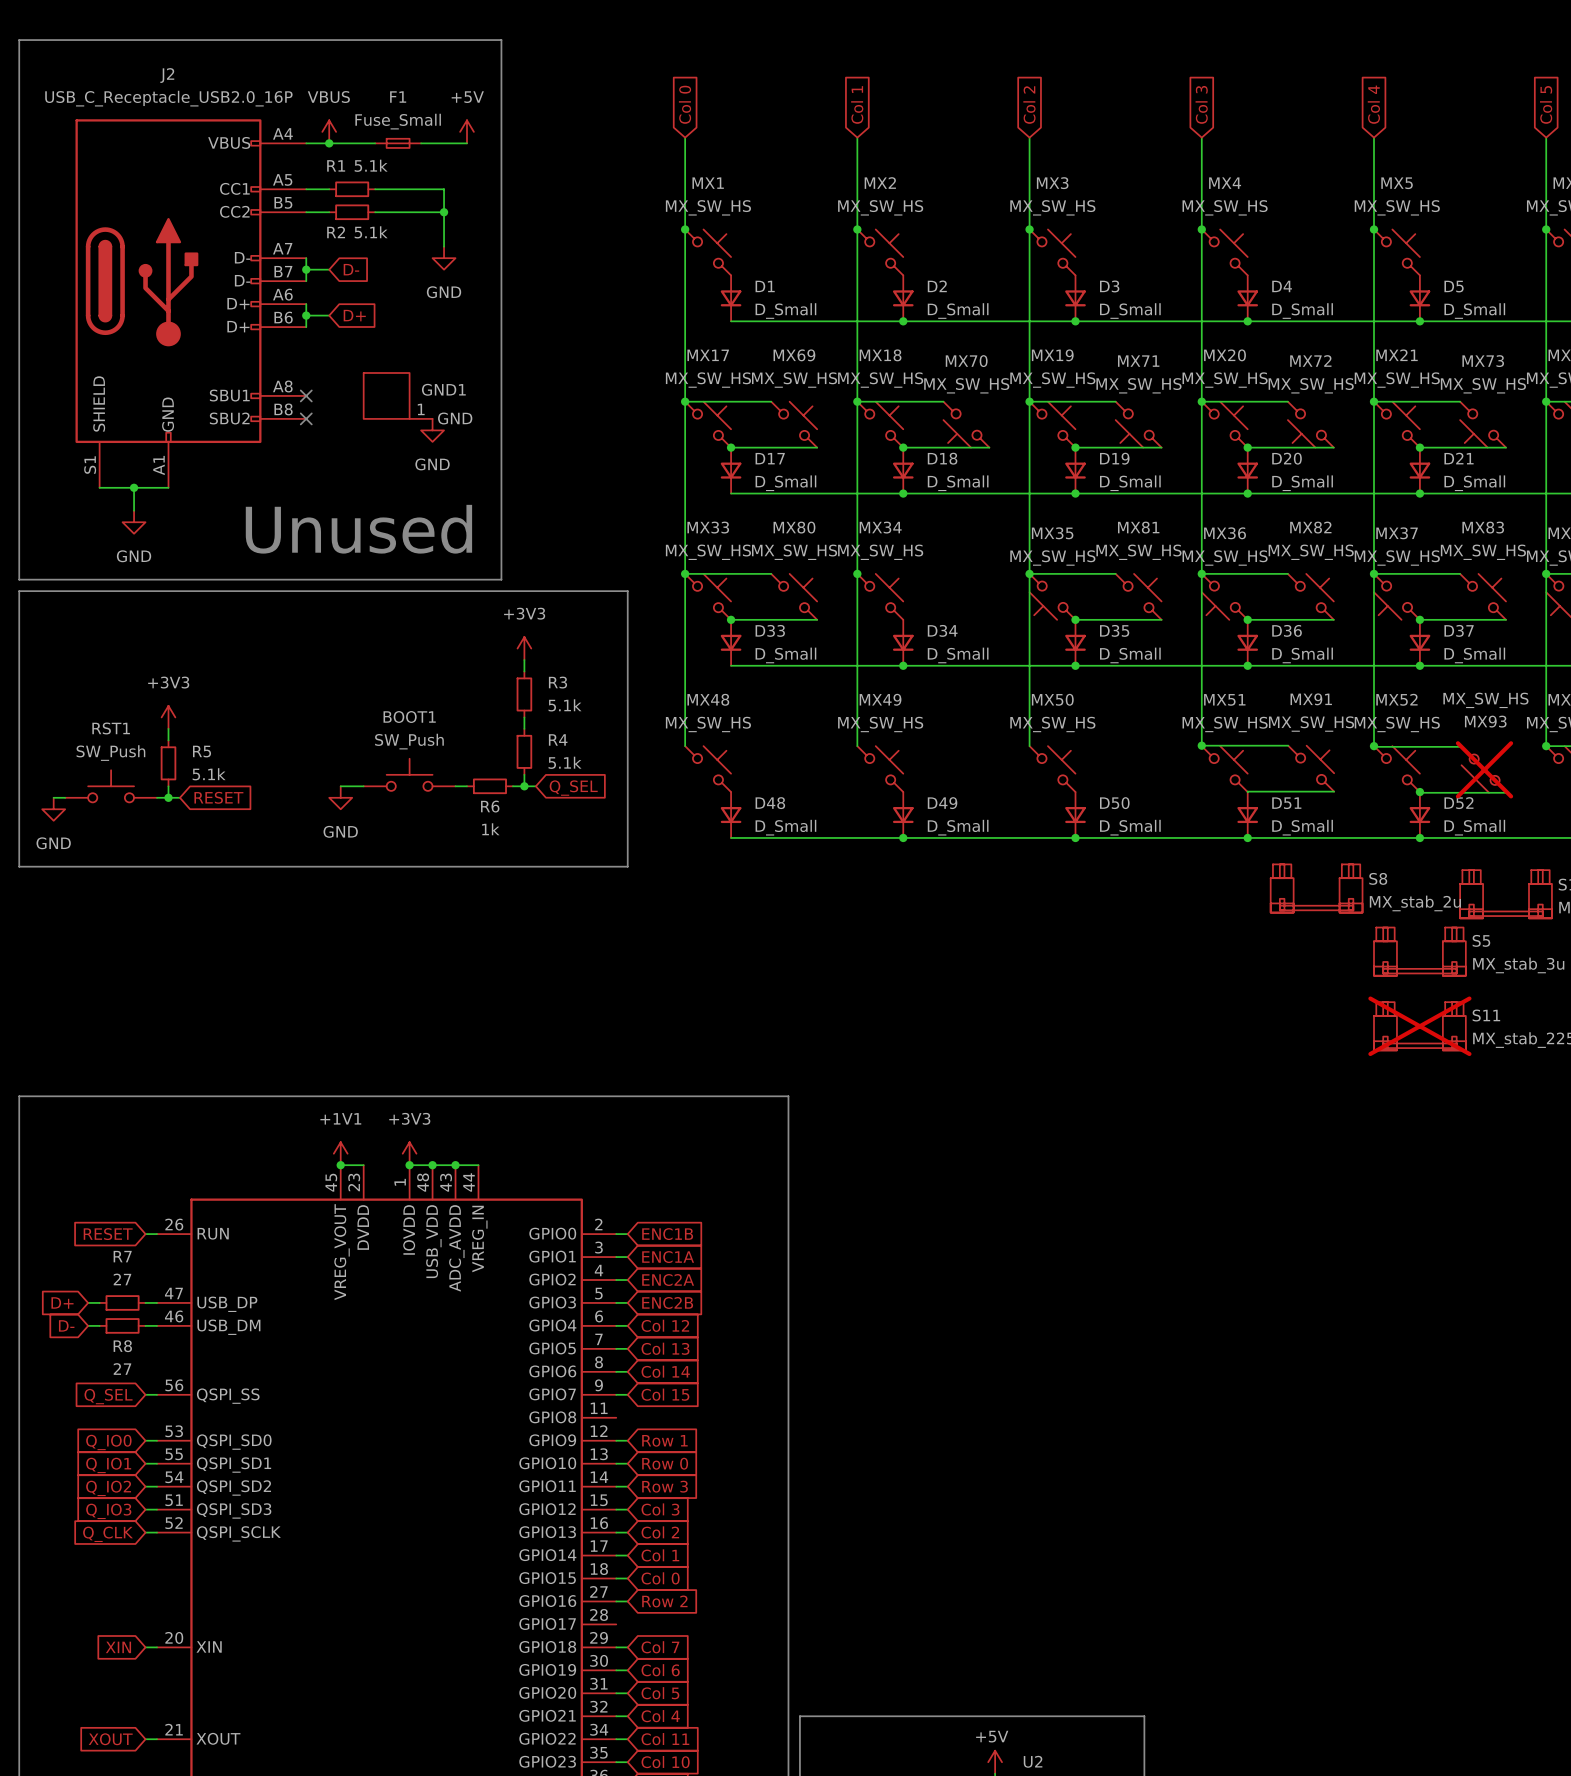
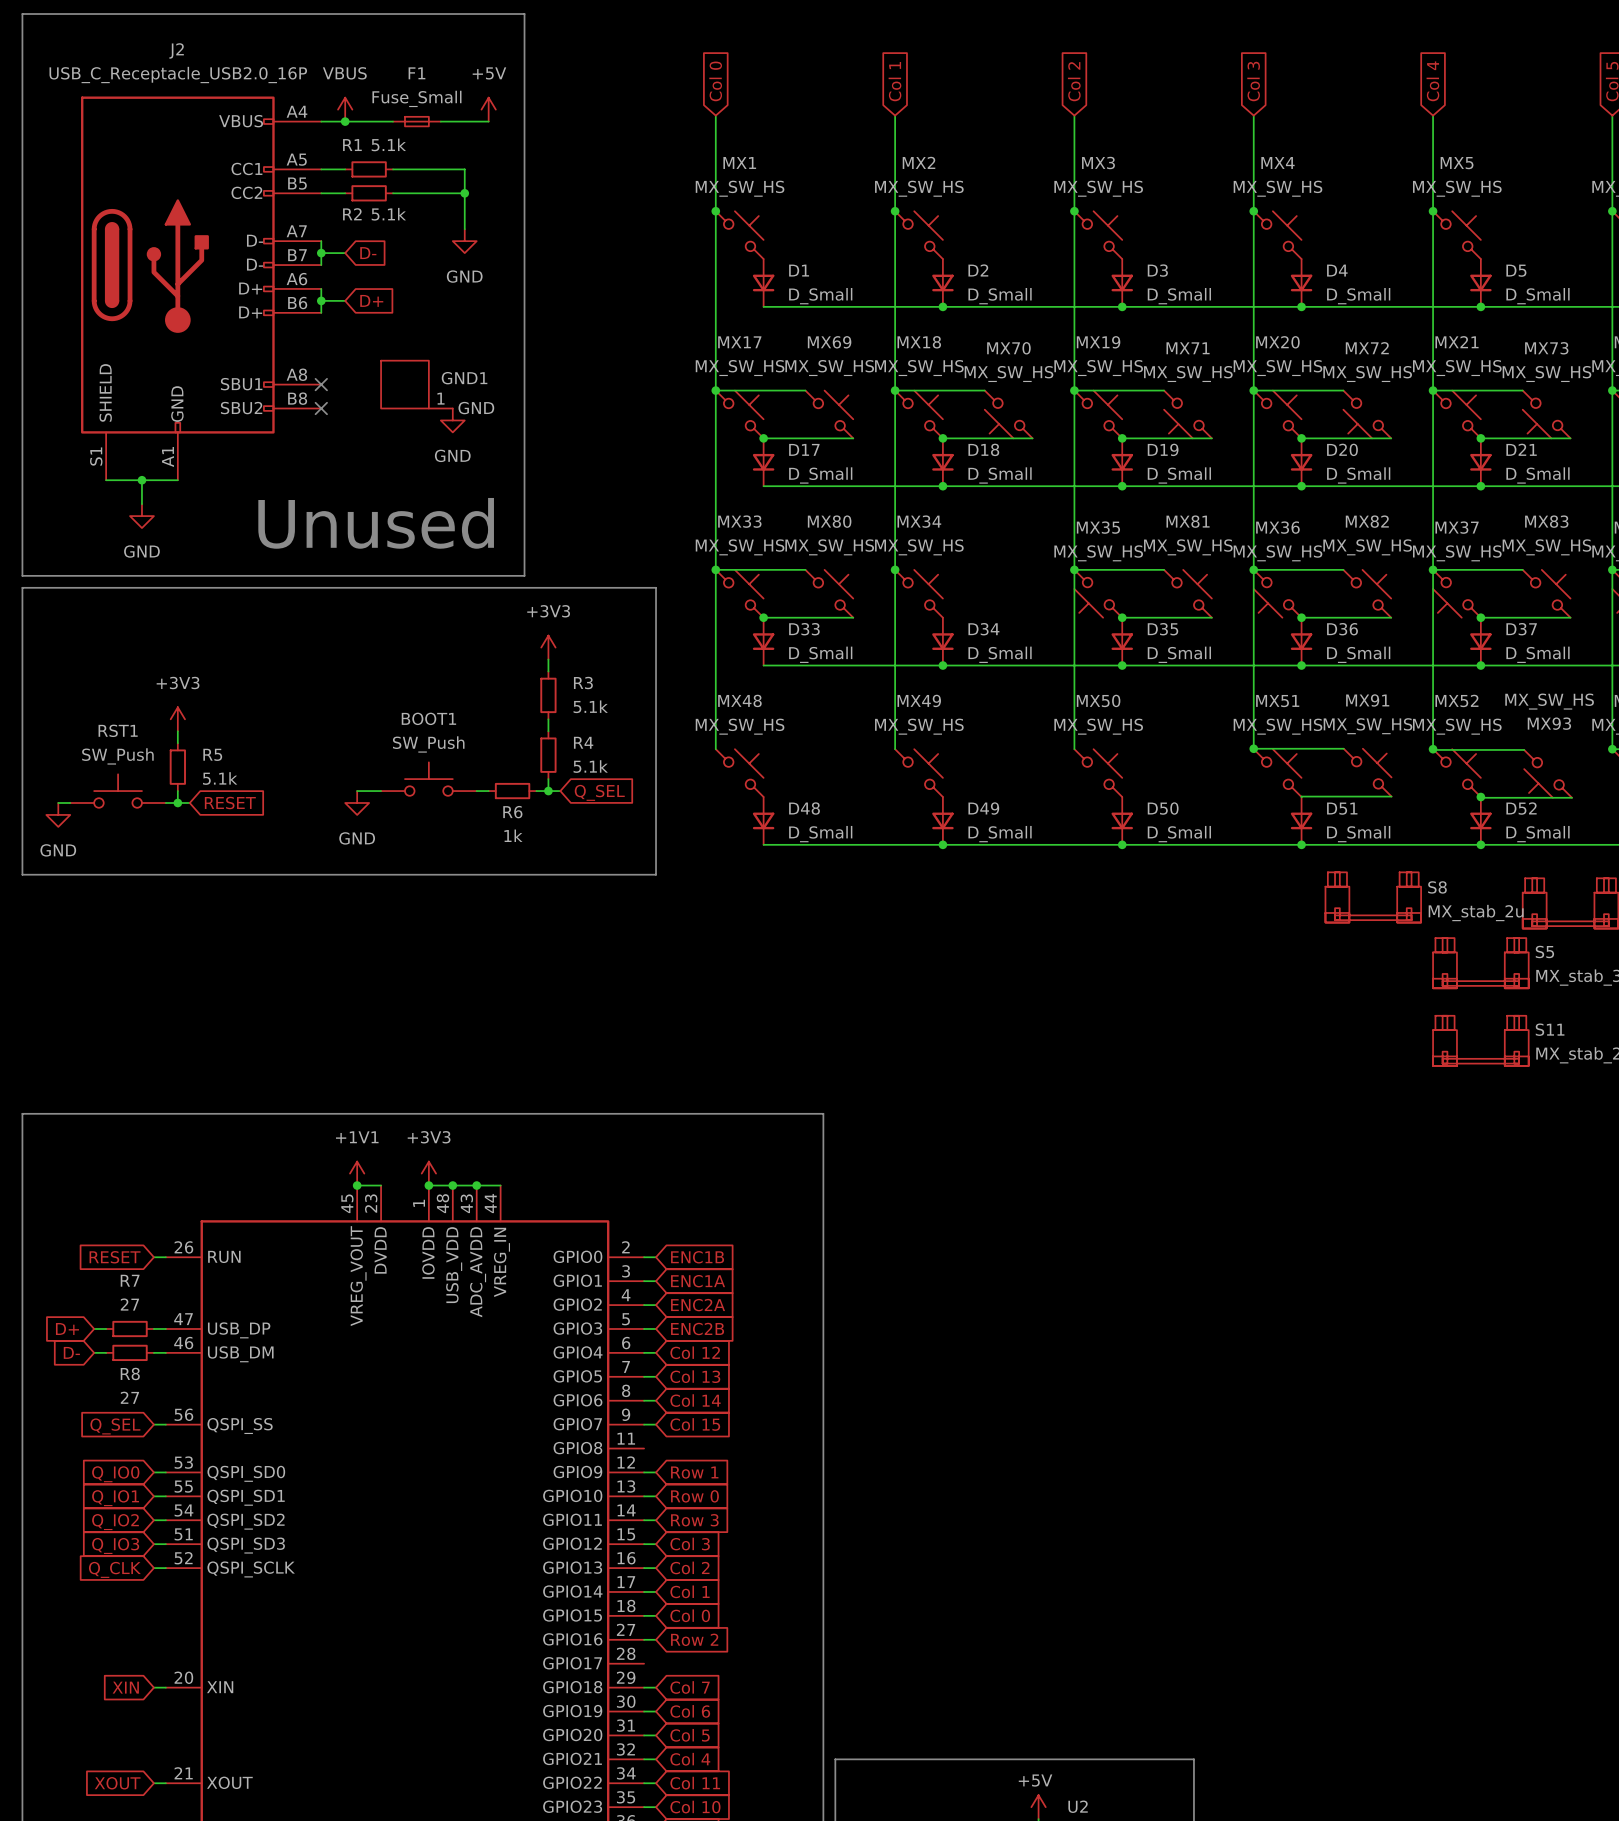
MX93 do-not-place cross: (1484, 769) -> none
S11 do-not-place cross: (1419, 1026) -> none

